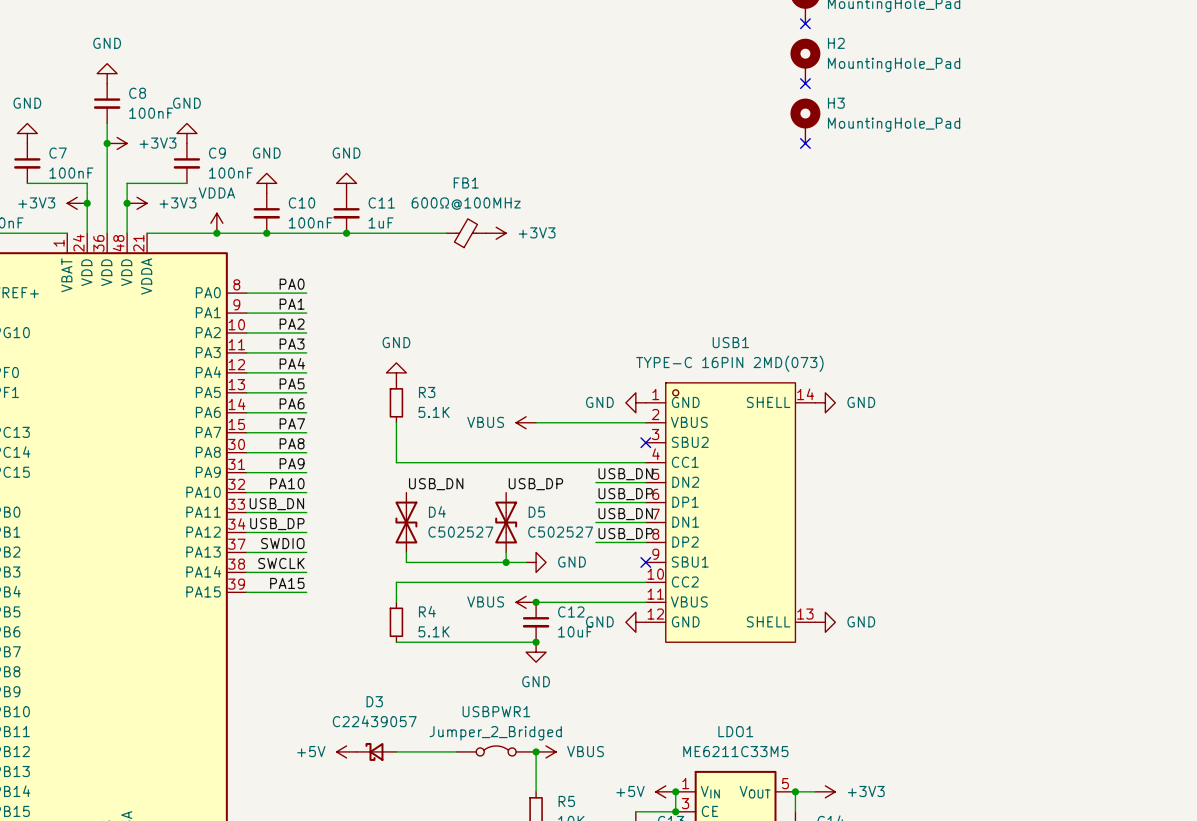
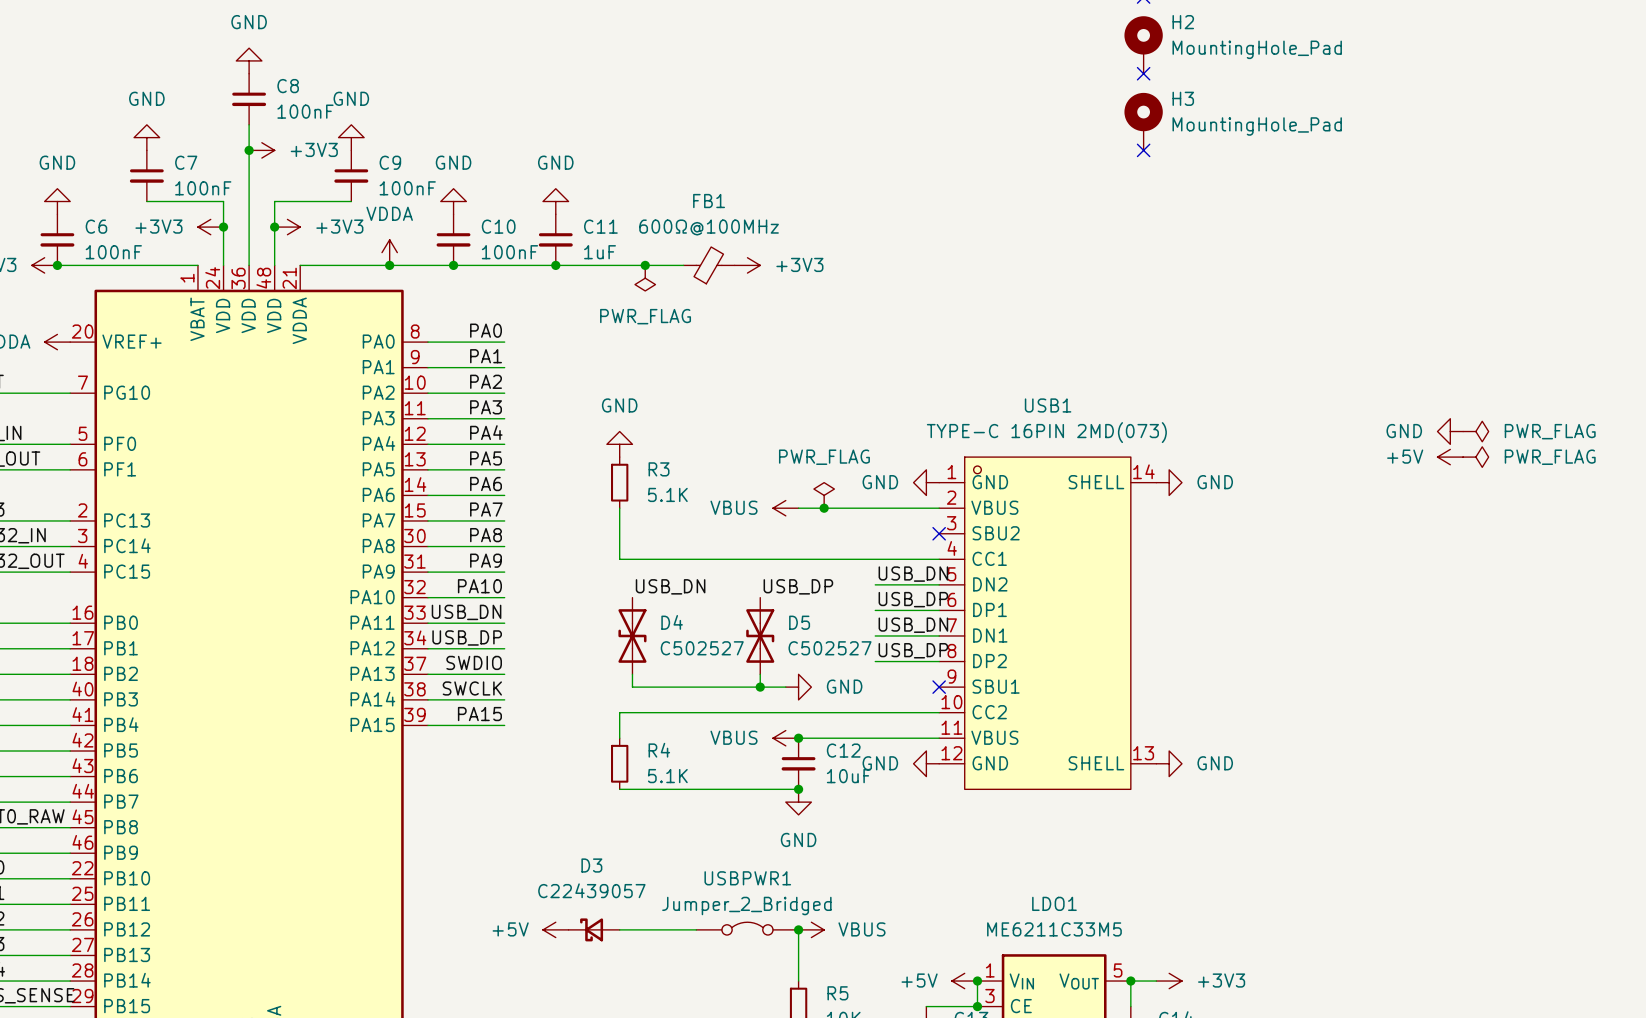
junction: none -> (645, 265)
power symbol: none -> PWR_FLAG (645, 278)
power symbol: none -> GND (1450, 431)
power symbol: none -> PWR_FLAG (1475, 431)
power symbol: none -> +5V (1450, 457)
power symbol: none -> PWR_FLAG (1475, 457)
power symbol: none -> PWR_FLAG (824, 495)
junction: none -> (824, 508)

